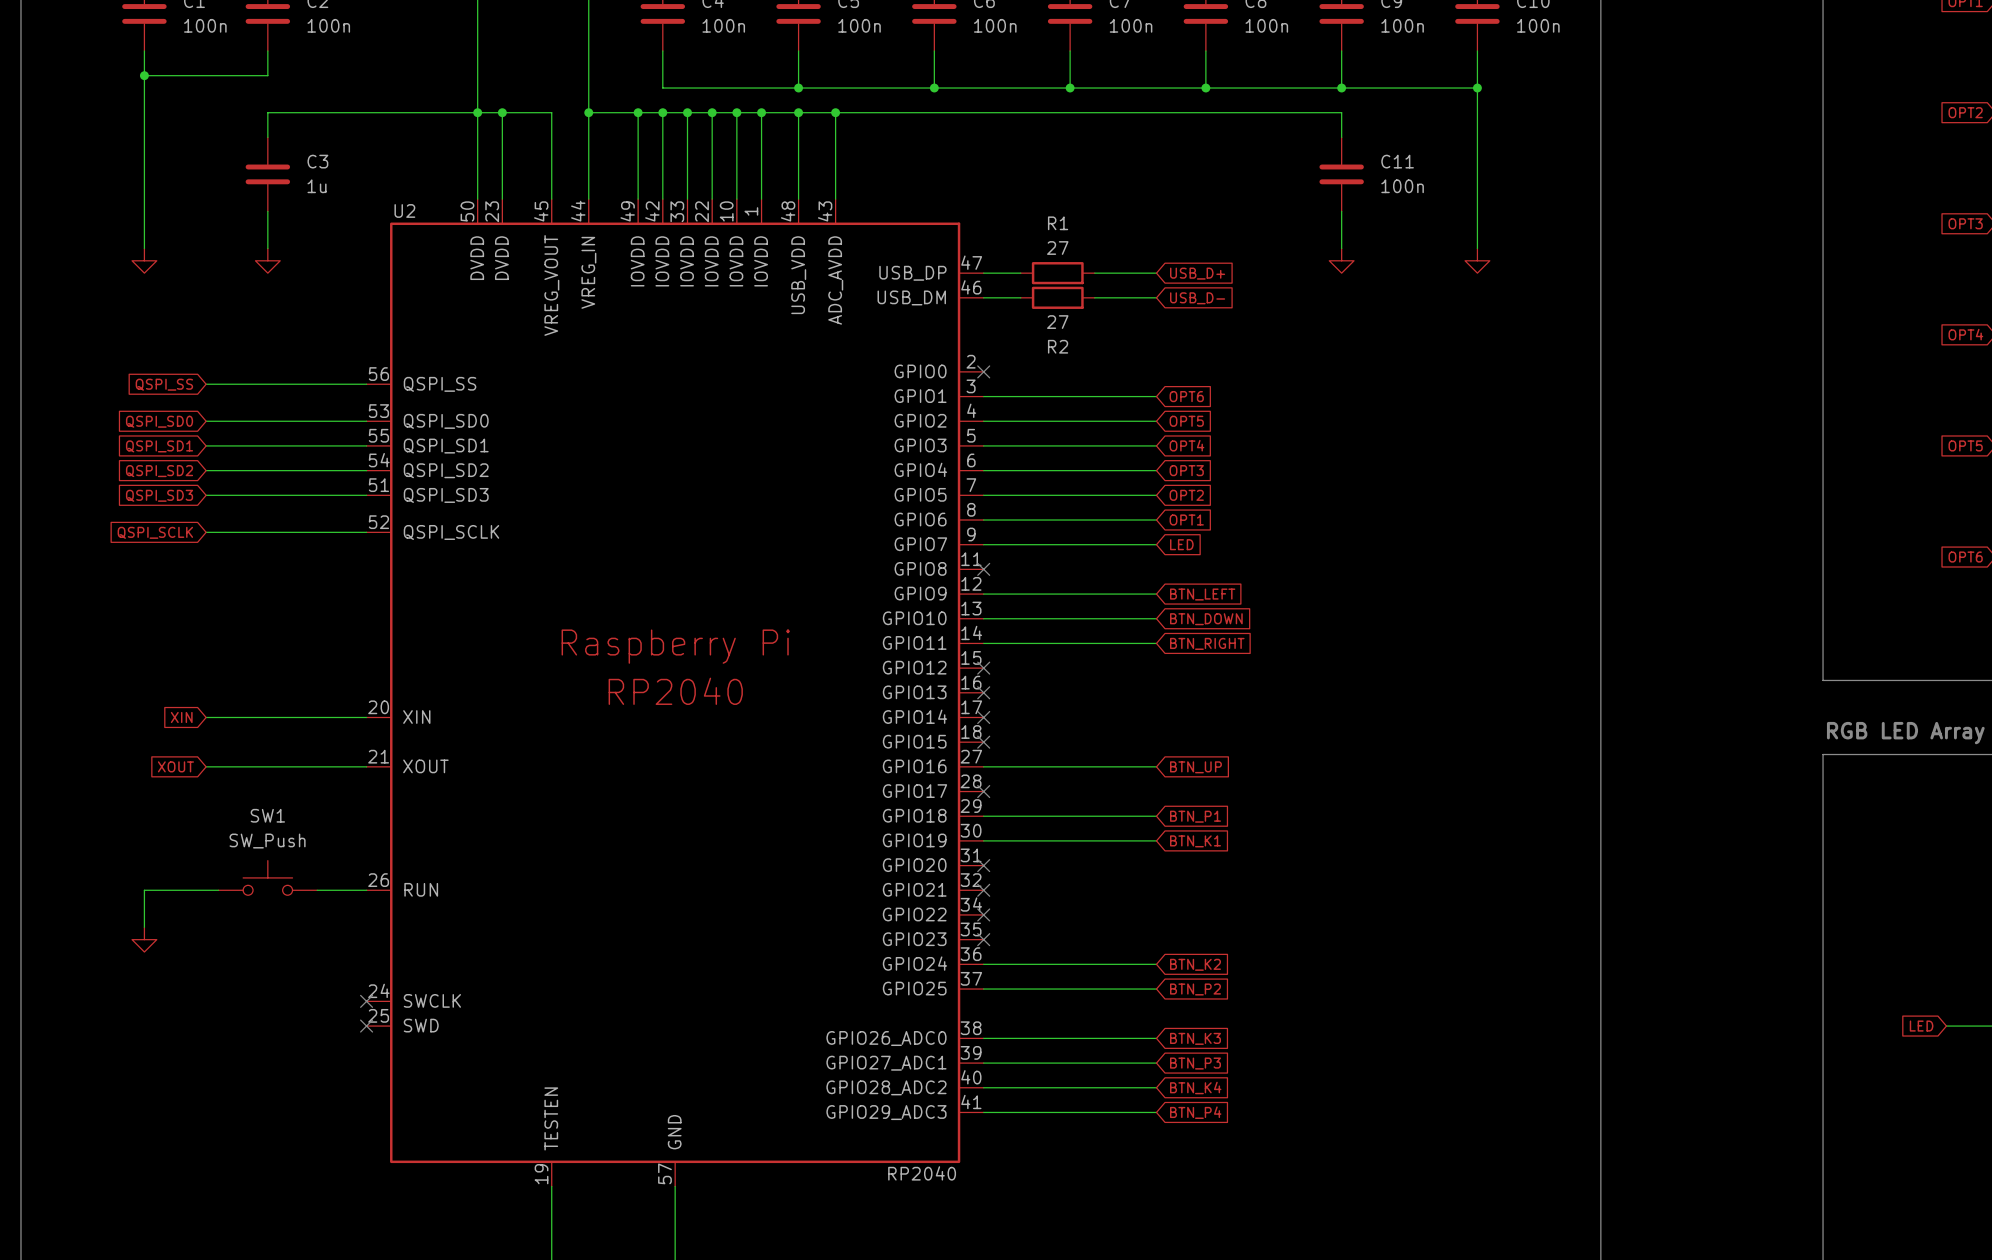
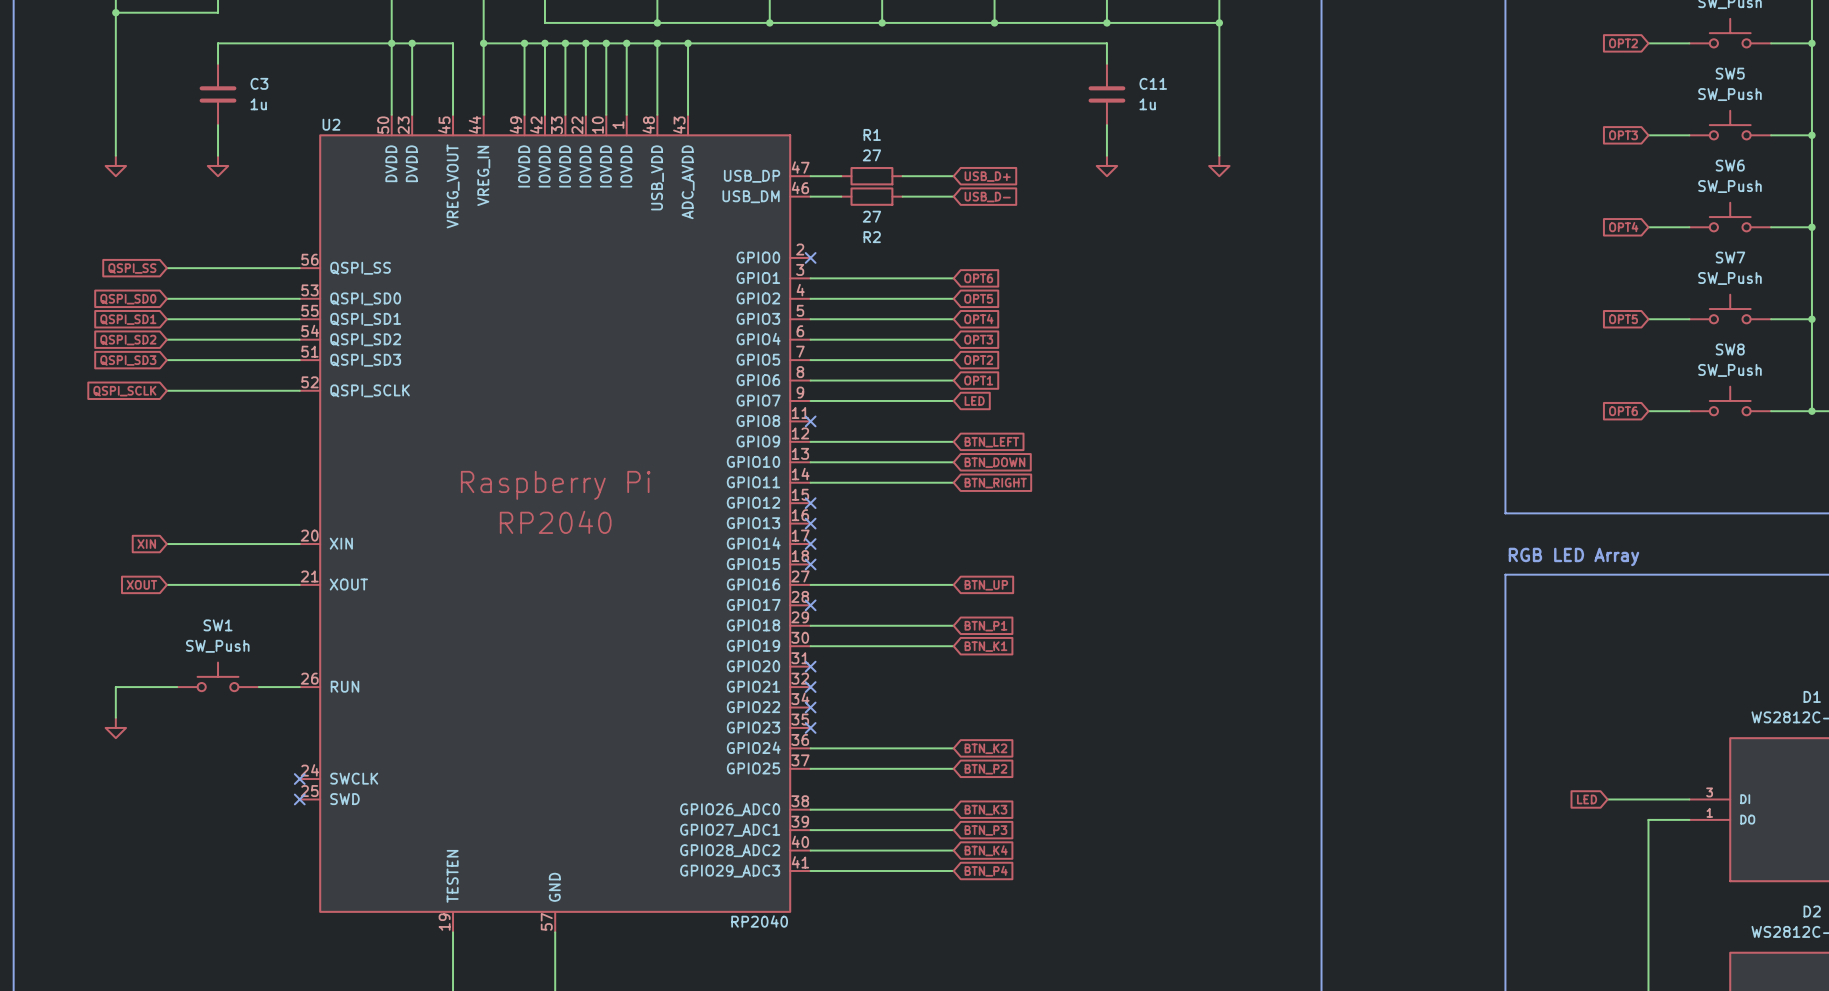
C11 value: 100n (1402, 186) -> 1u (1147, 104)

